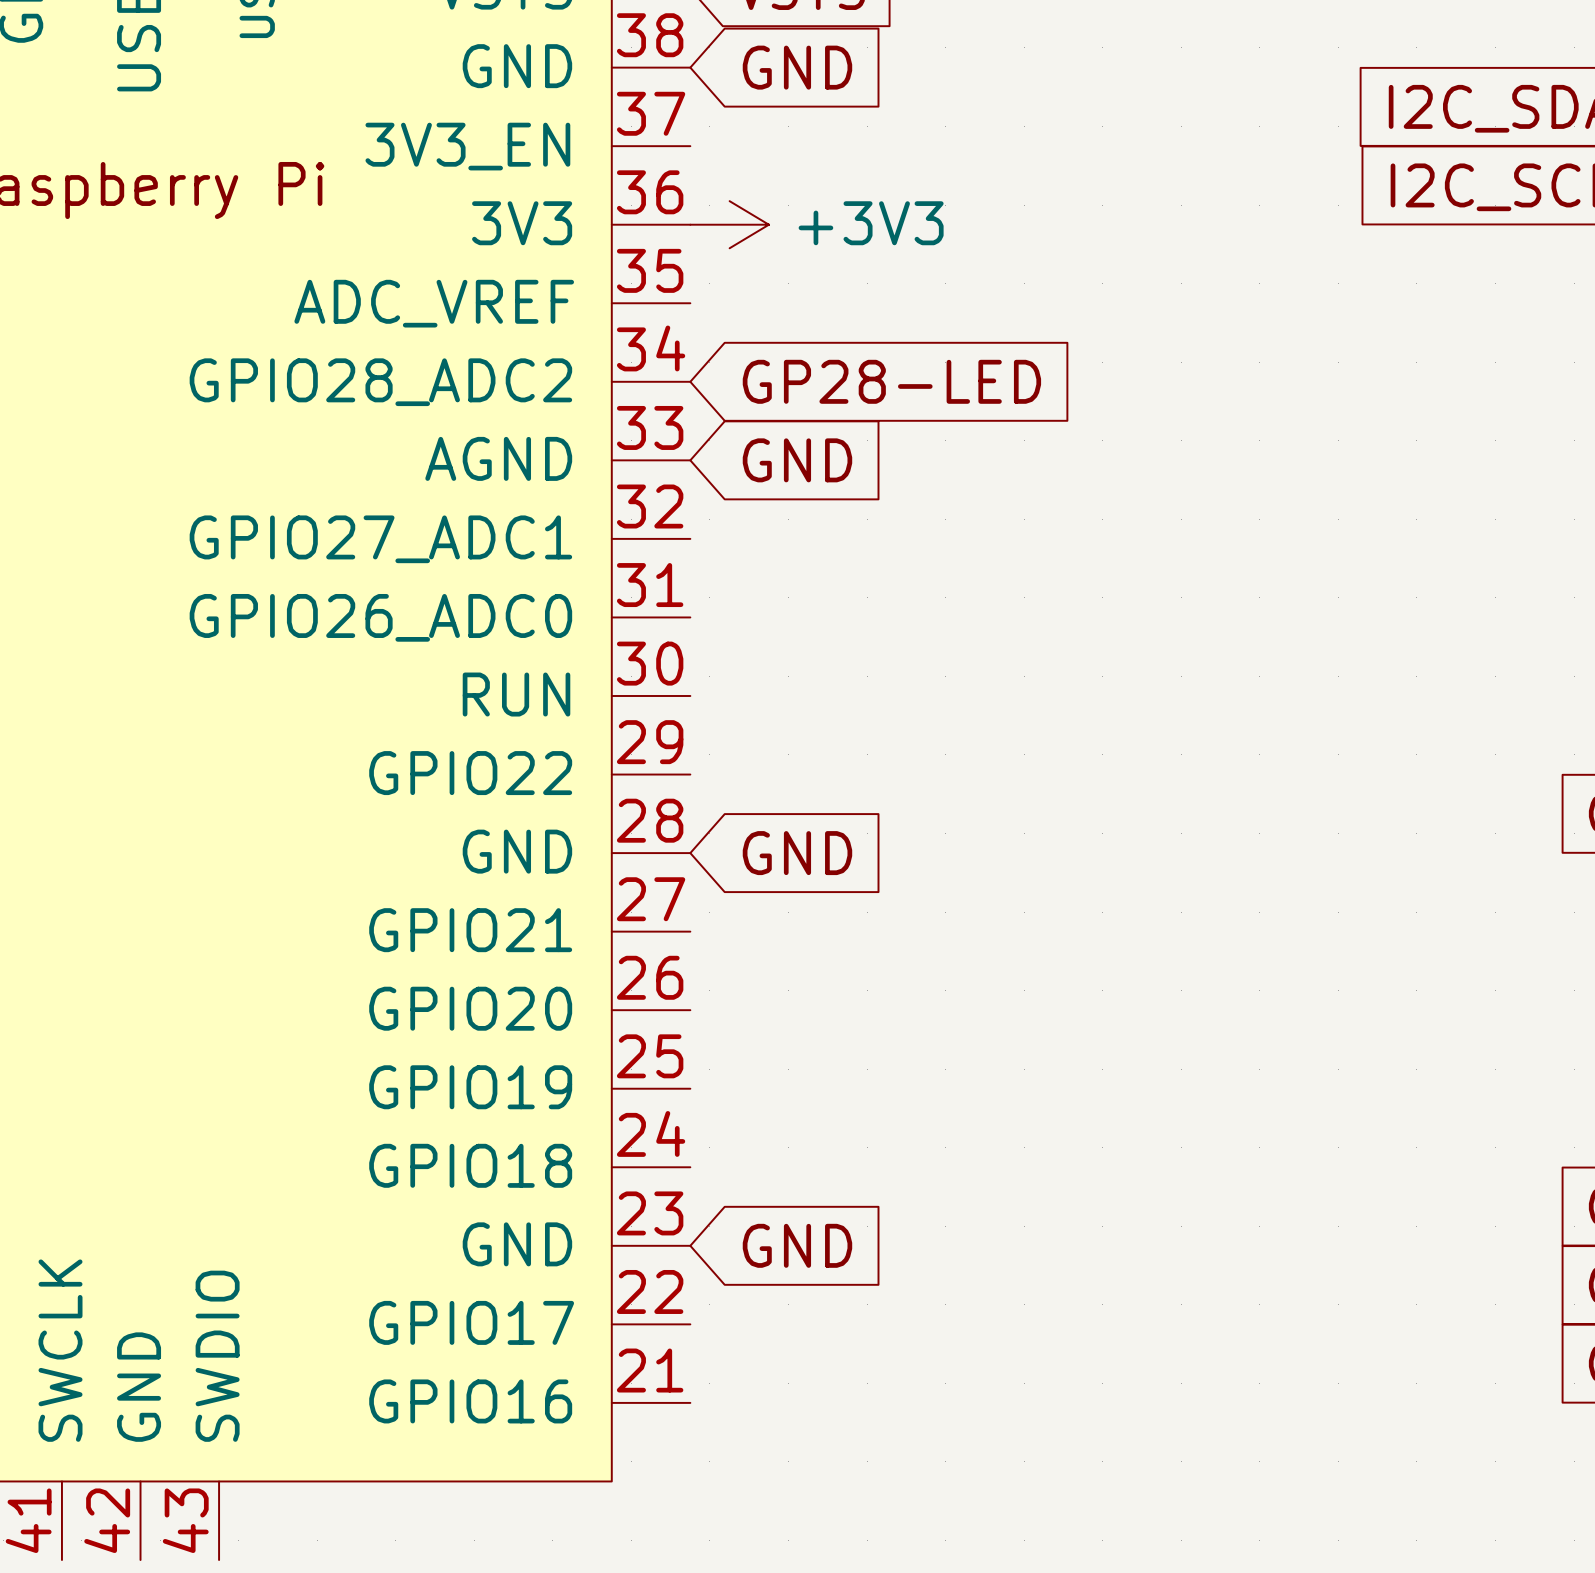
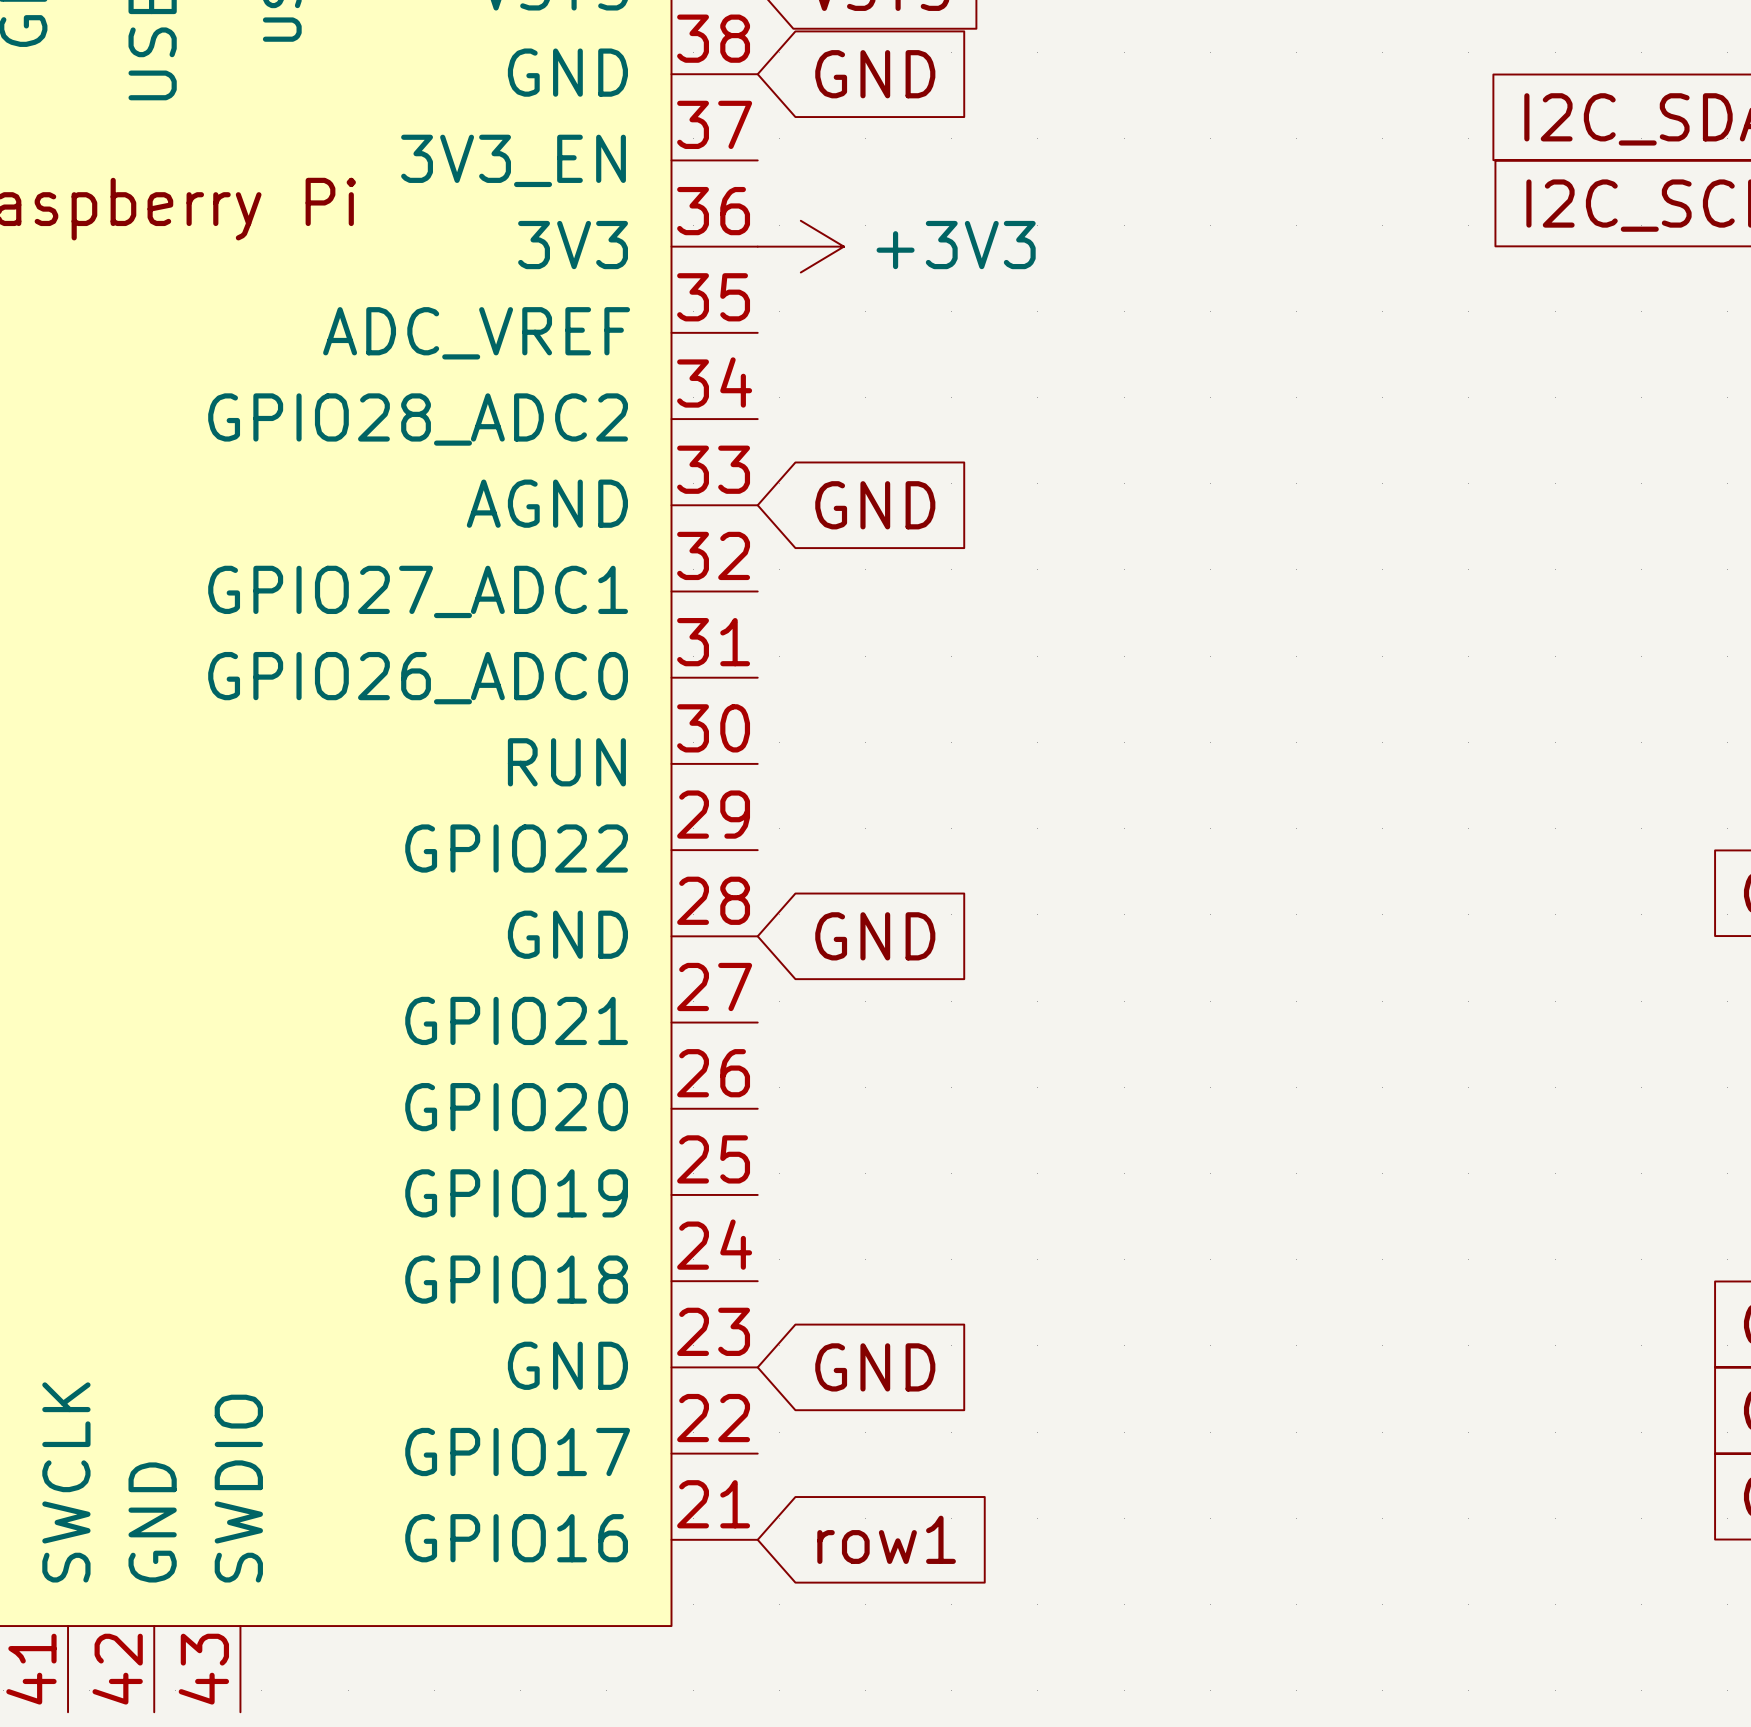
global label: GP28-LED (891, 381) -> none
global label: none -> row1 (886, 1539)

